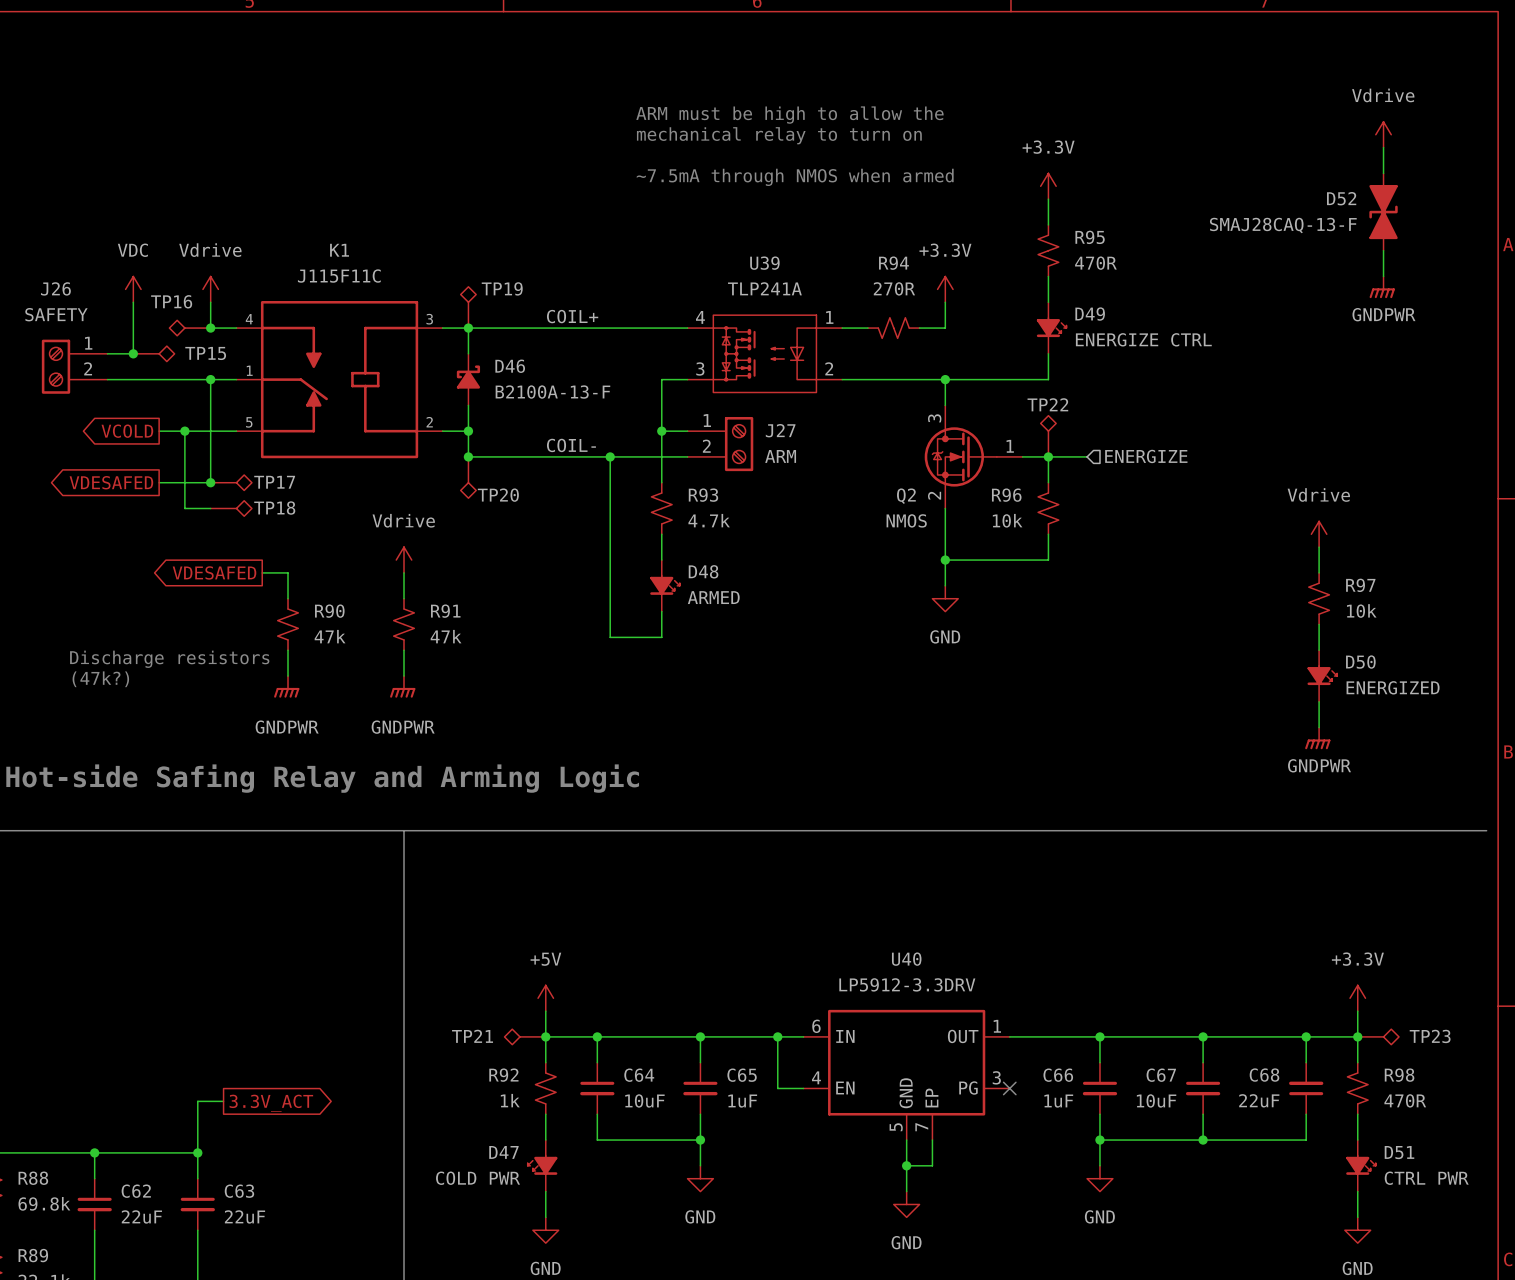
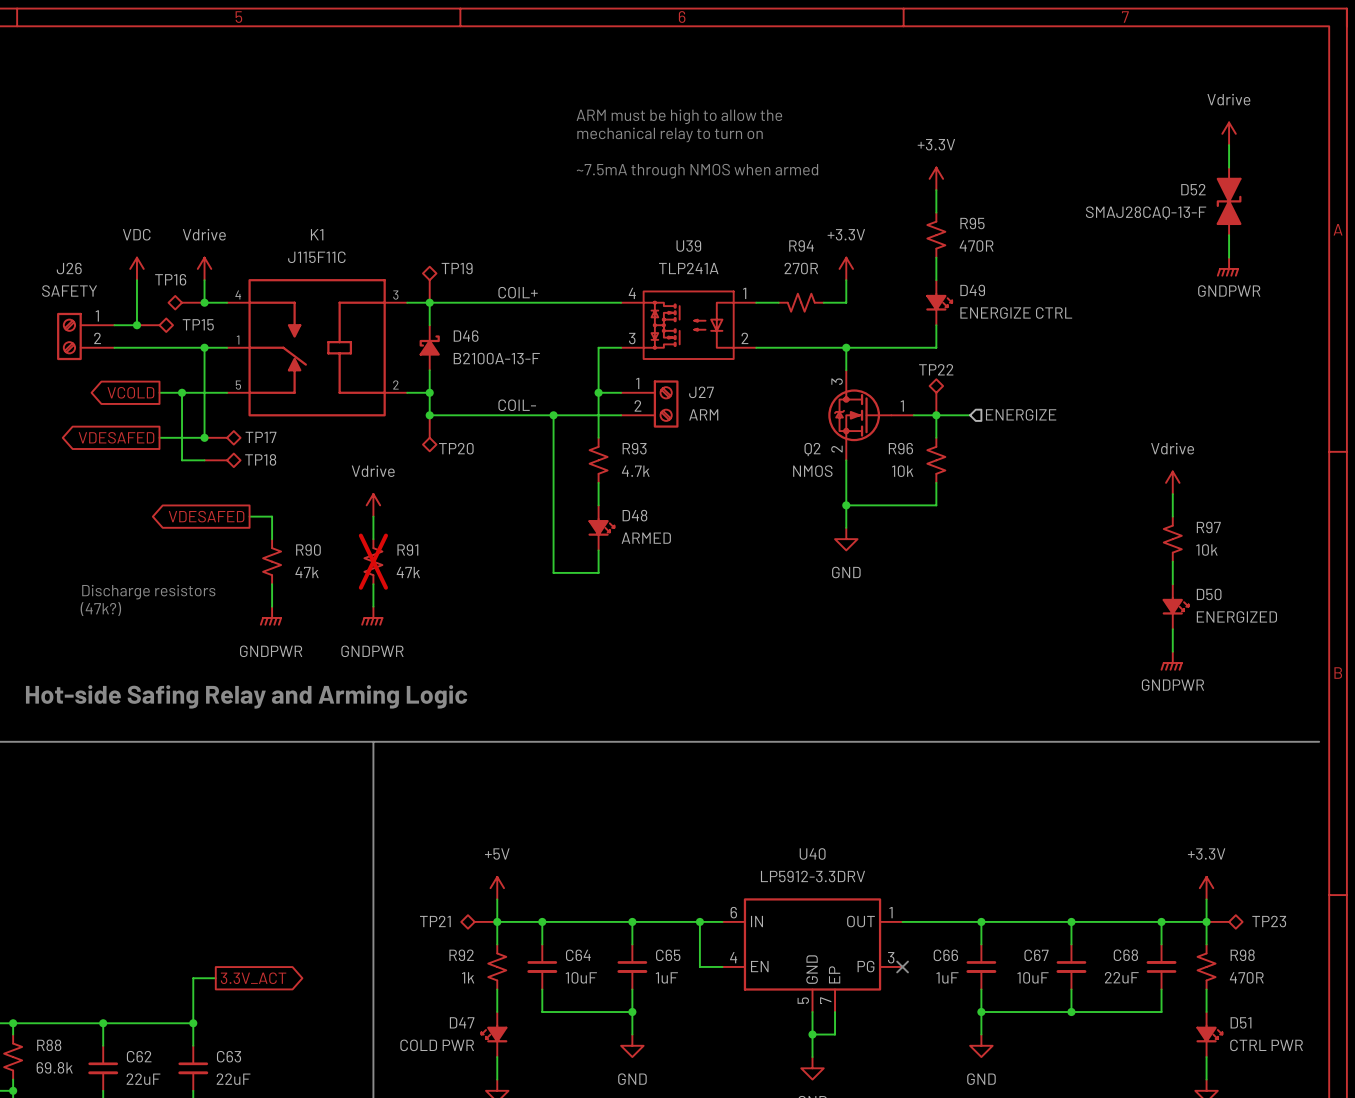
R91 do-not-place cross: none -> (373, 561)

